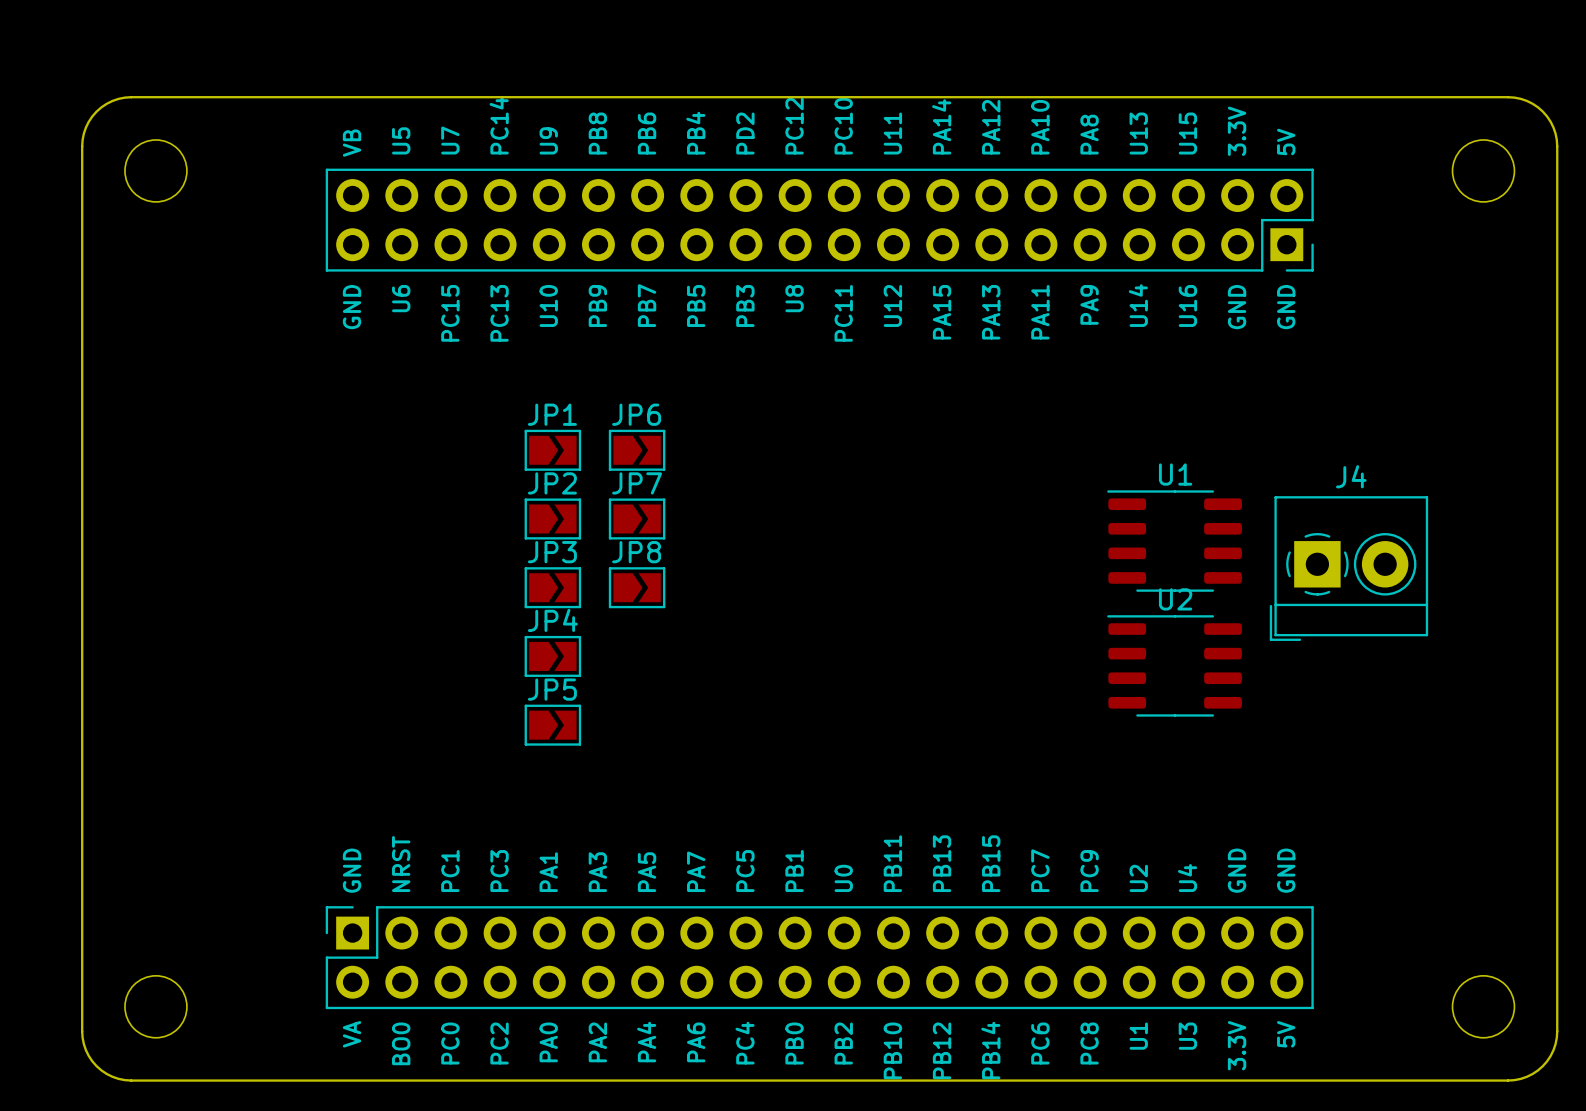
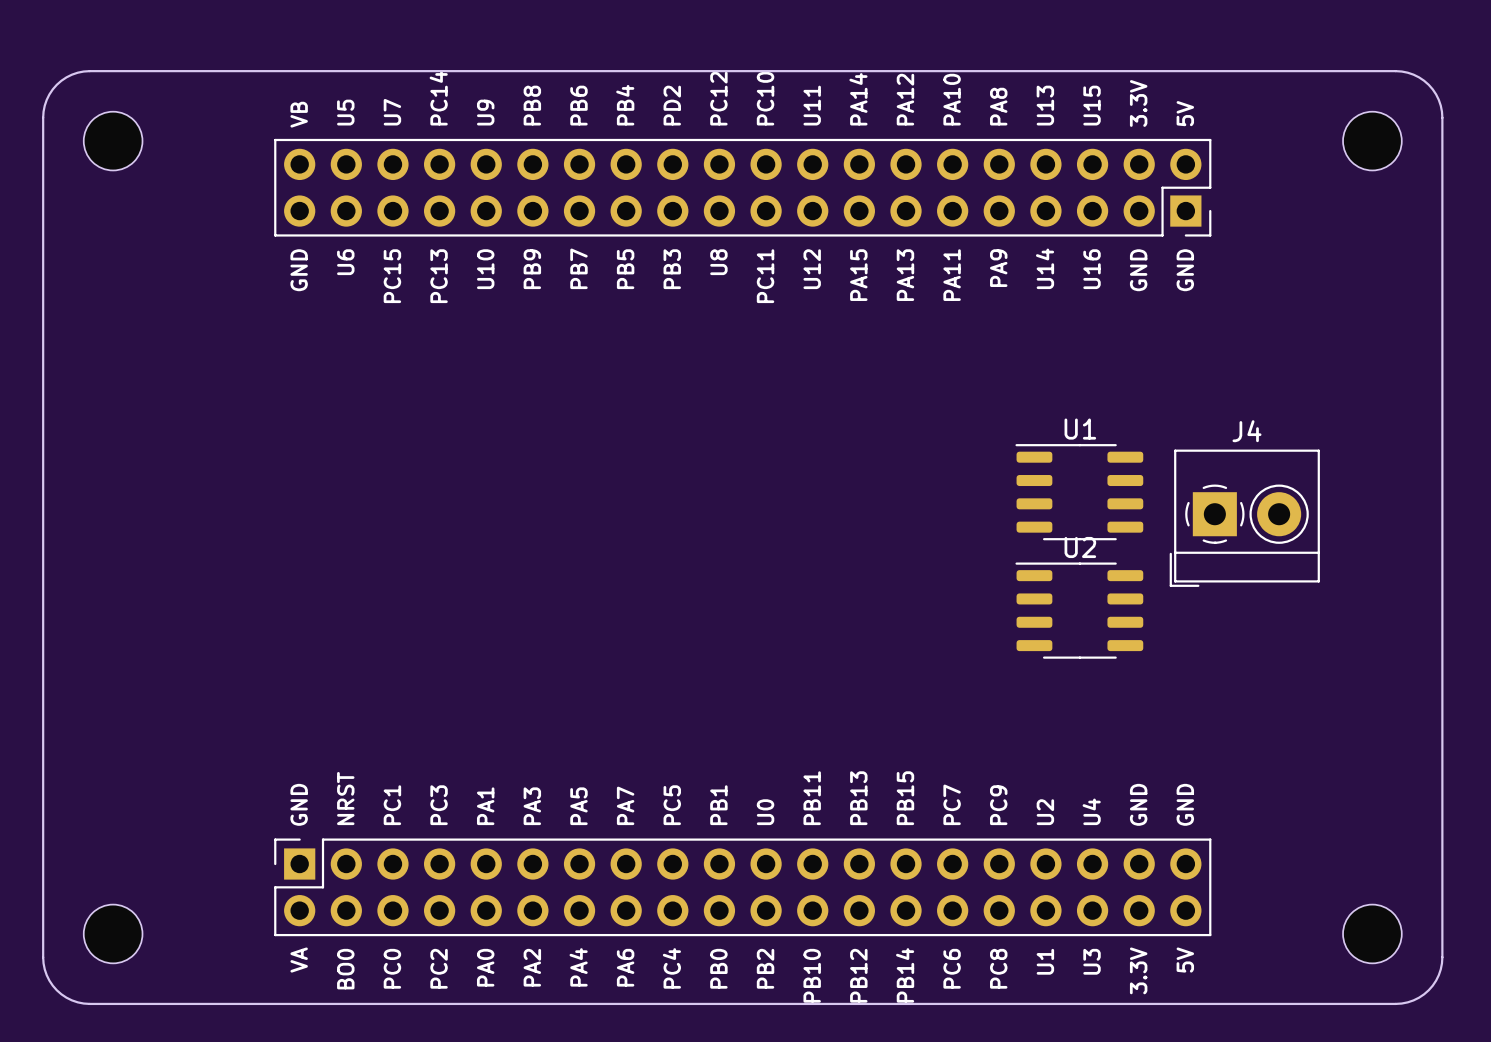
JP1: (552, 450) -> none
JP6: (637, 450) -> none
JP2: (552, 518) -> none
JP7: (637, 518) -> none
JP3: (552, 587) -> none
JP8: (637, 587) -> none
JP4: (552, 656) -> none
JP5: (552, 725) -> none

